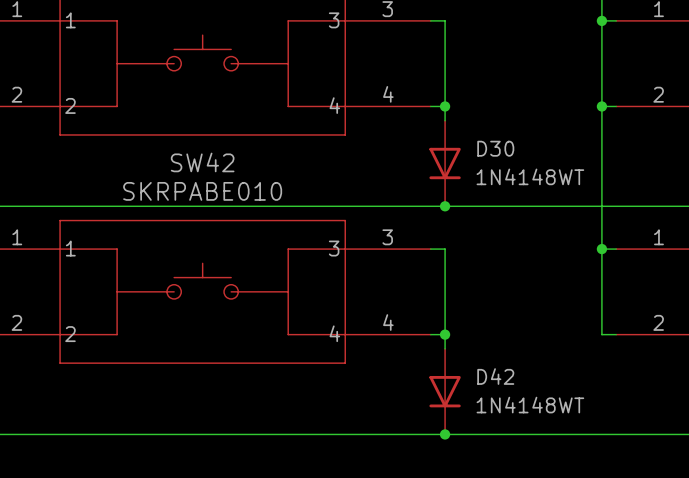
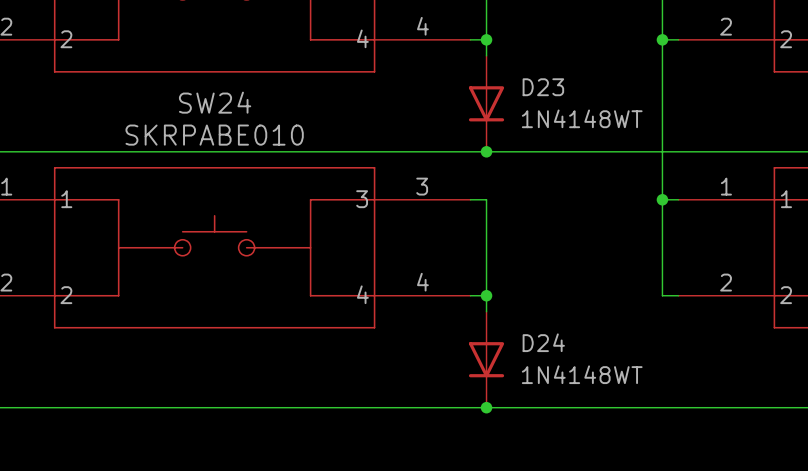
D30 name: D30 (495, 148) -> D23 (543, 87)
SW42 name: SW42 (202, 162) -> SW24 (215, 102)
D42 name: D42 (495, 376) -> D24 (543, 342)

